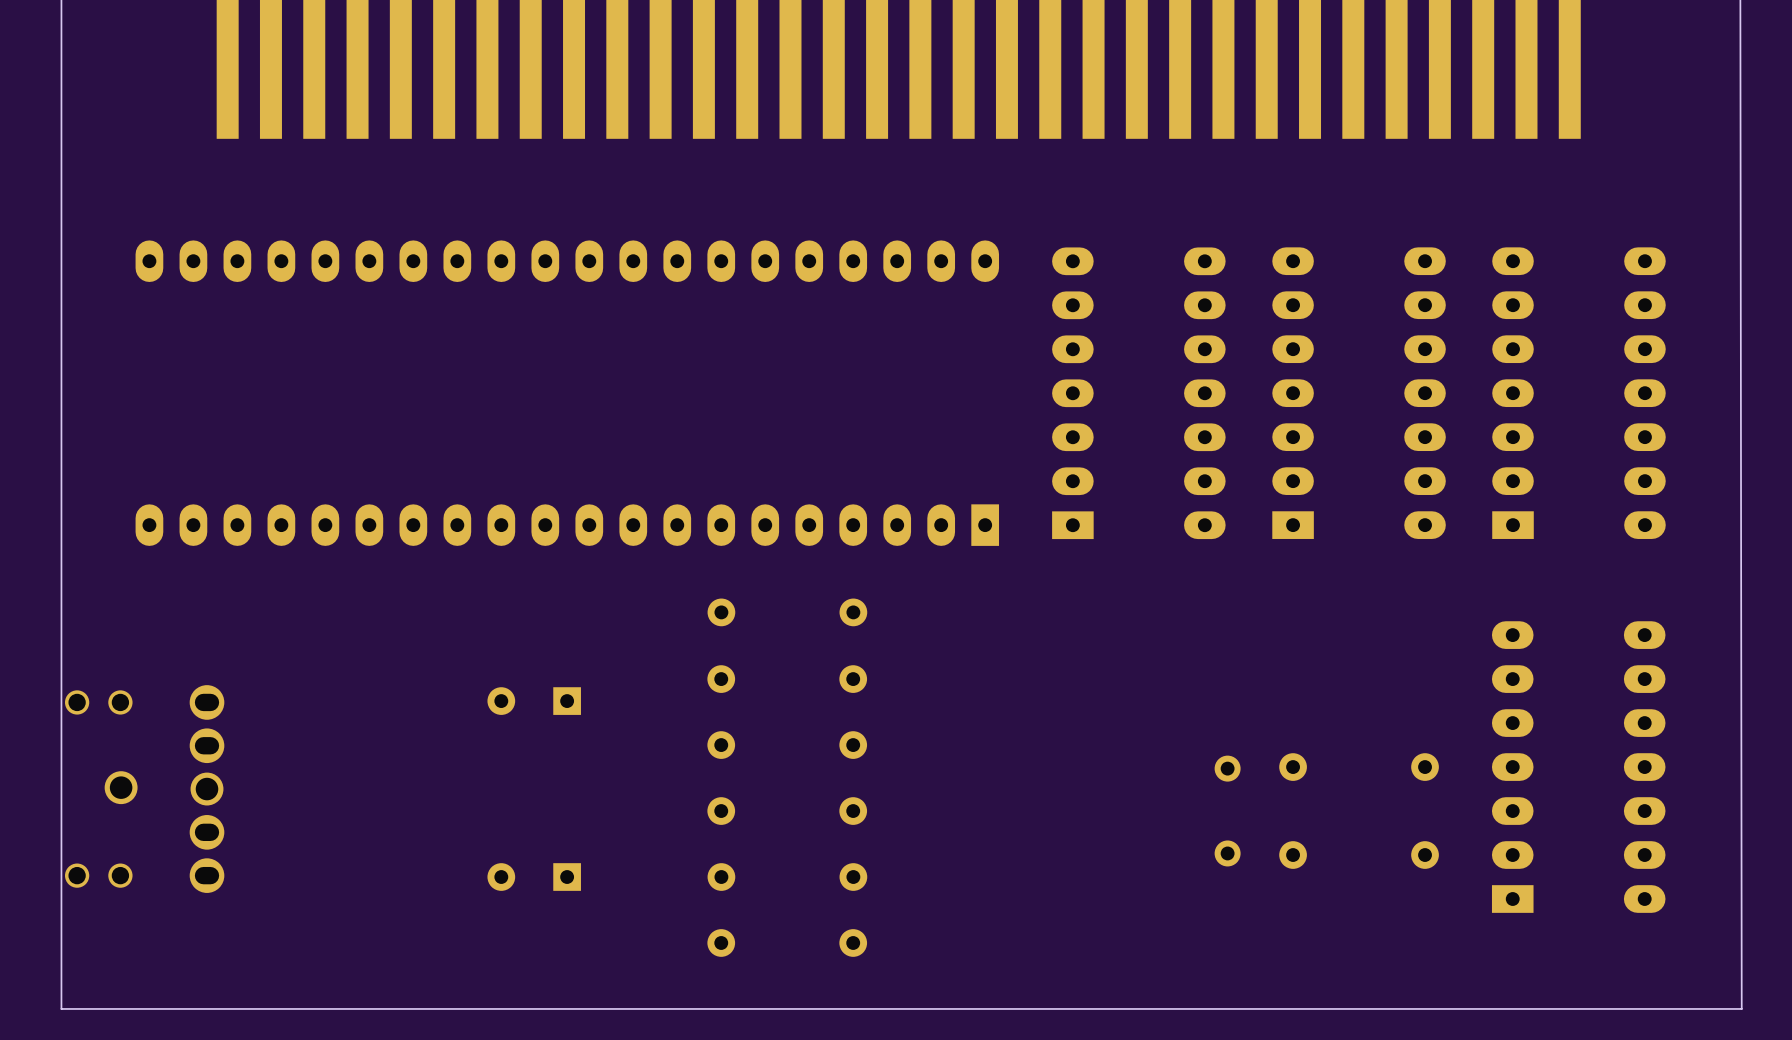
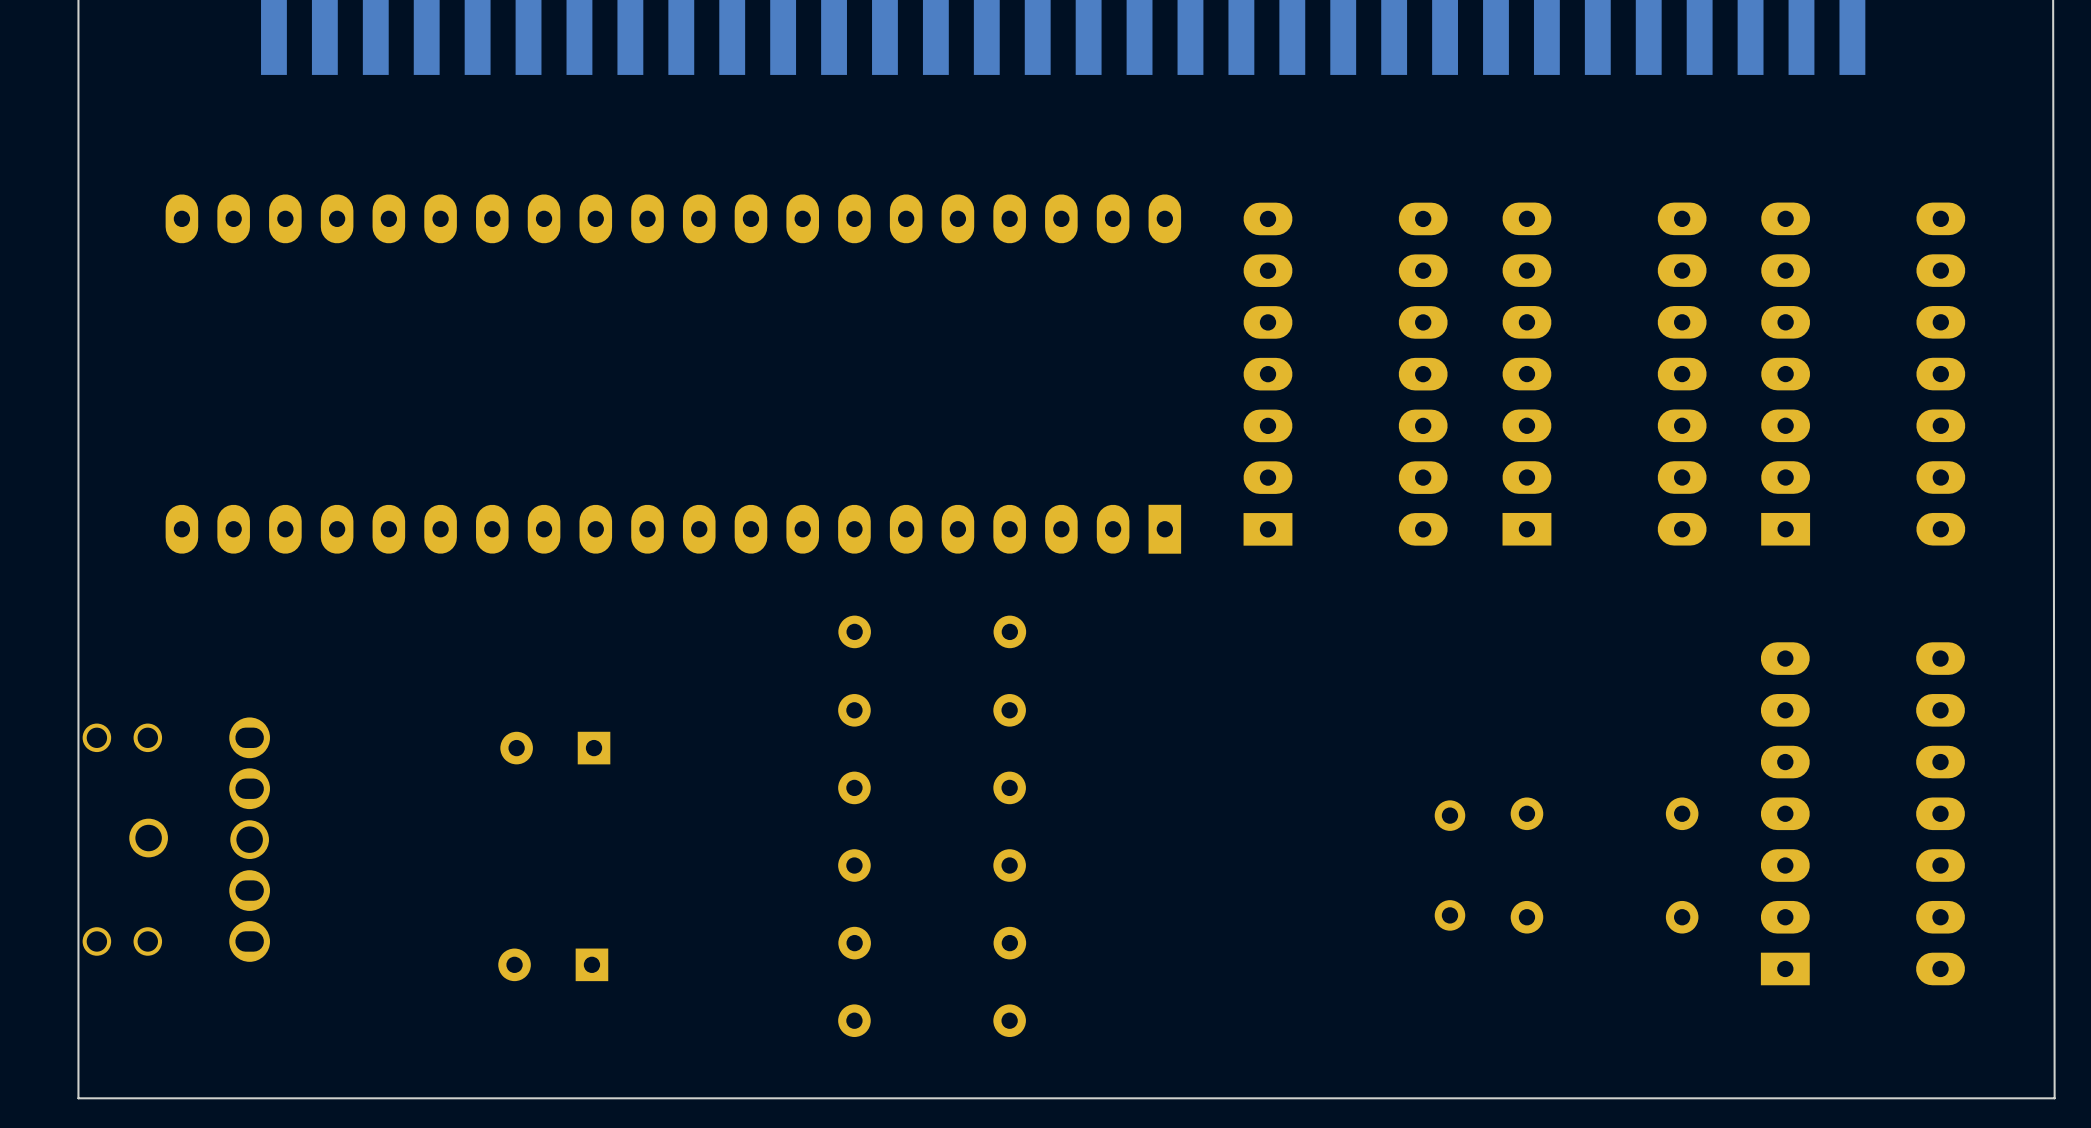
part position: (534, 701) -> (555, 748)
part position: (534, 877) -> (553, 964)

